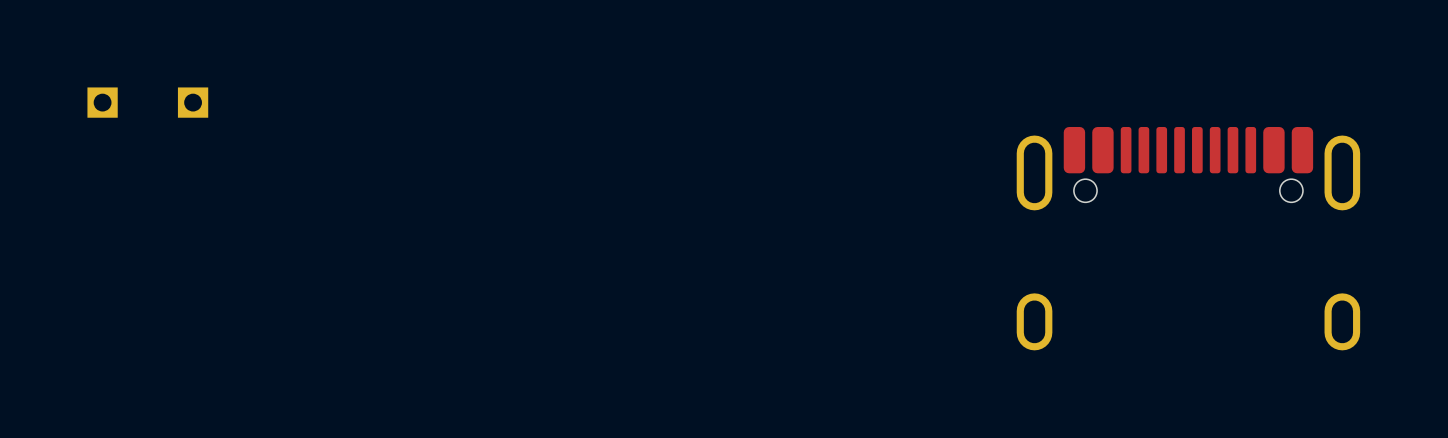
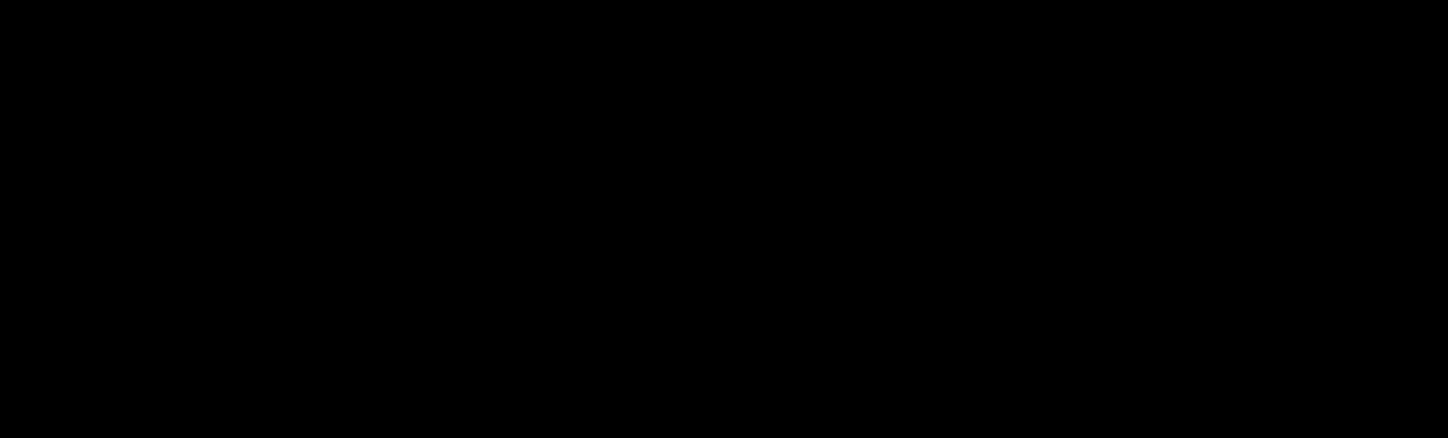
part: (102, 102) -> none
part: (193, 102) -> none
part: (1188, 238) -> none

